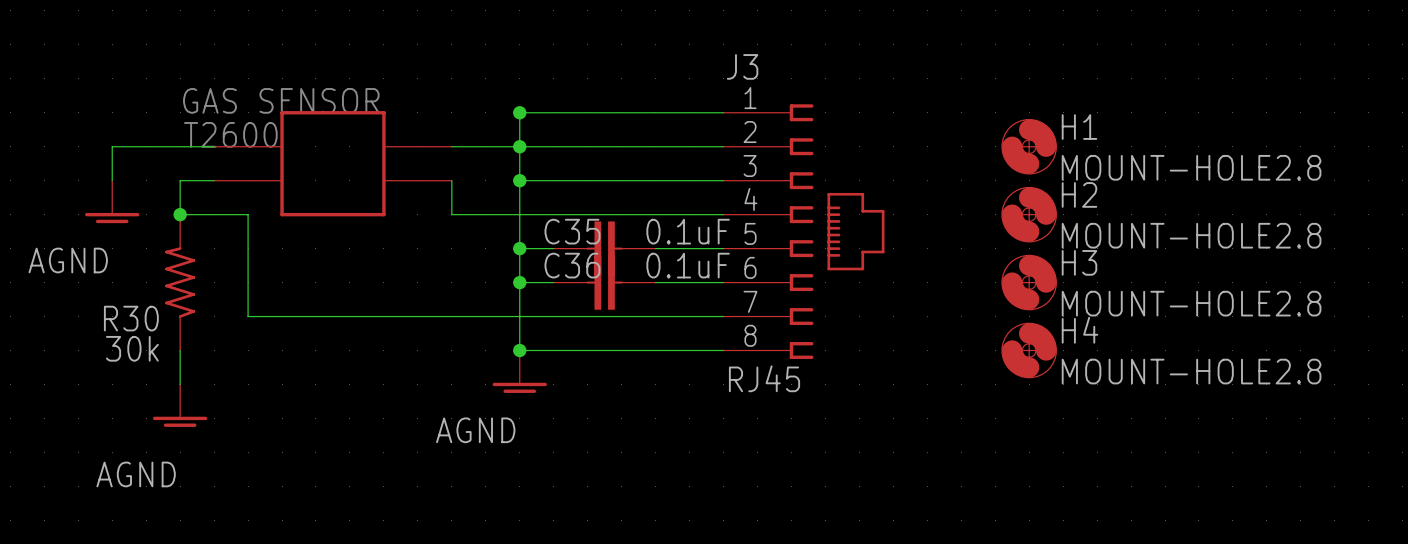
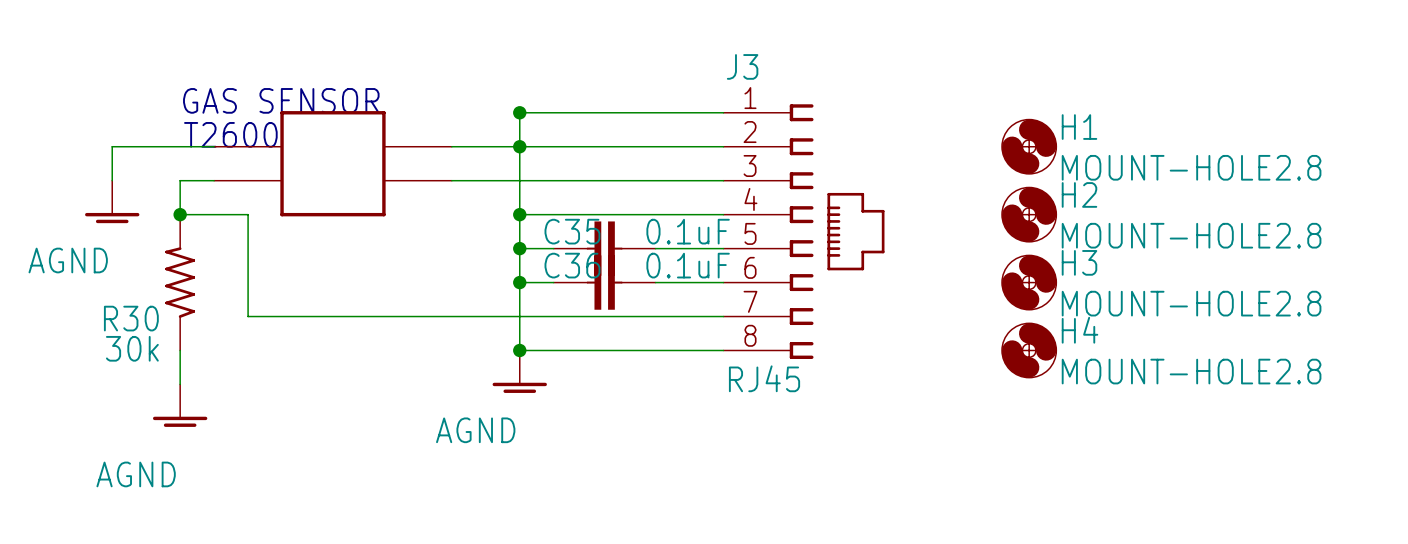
wire: (451, 180) (451, 214) (519, 214) -> (451, 180) (519, 180)
junction position: (519, 180) -> (519, 214)

